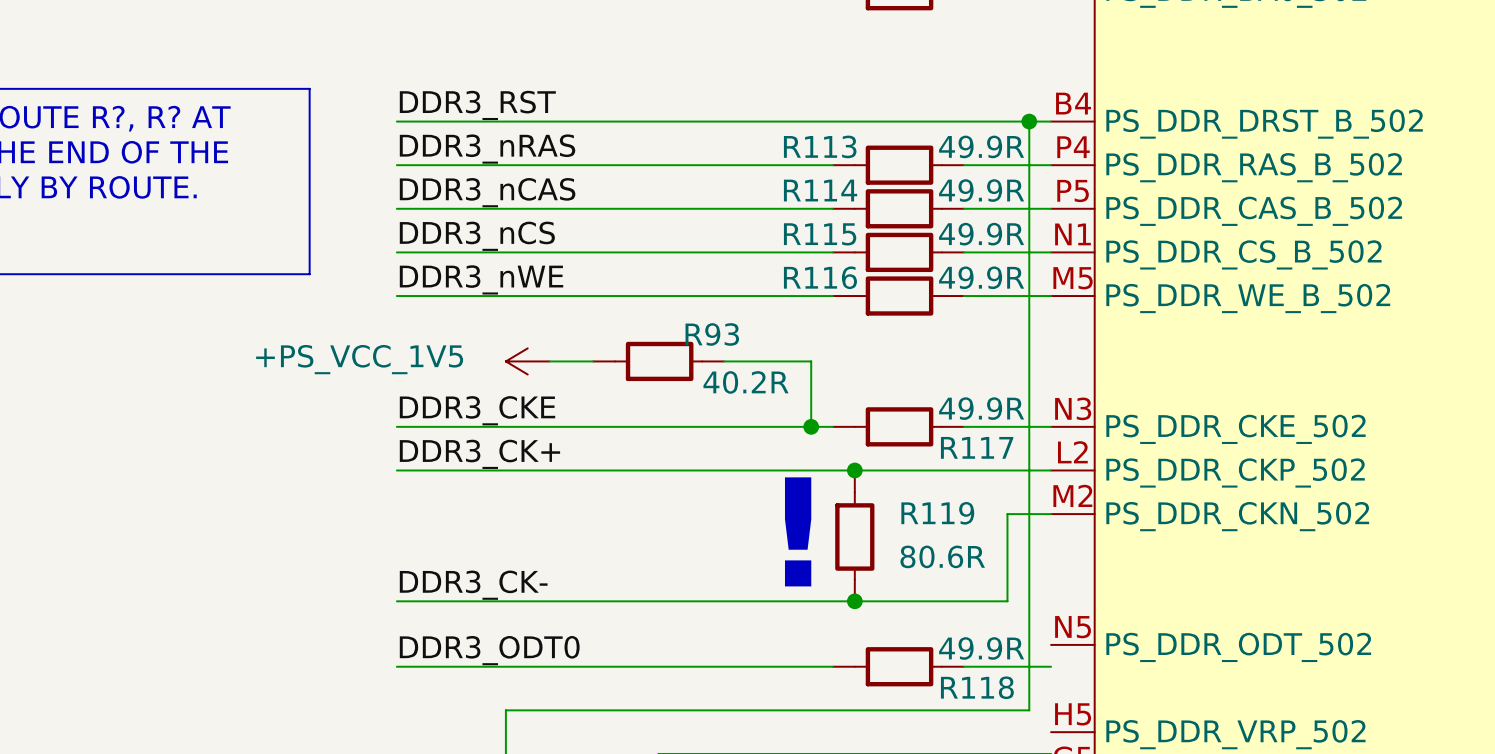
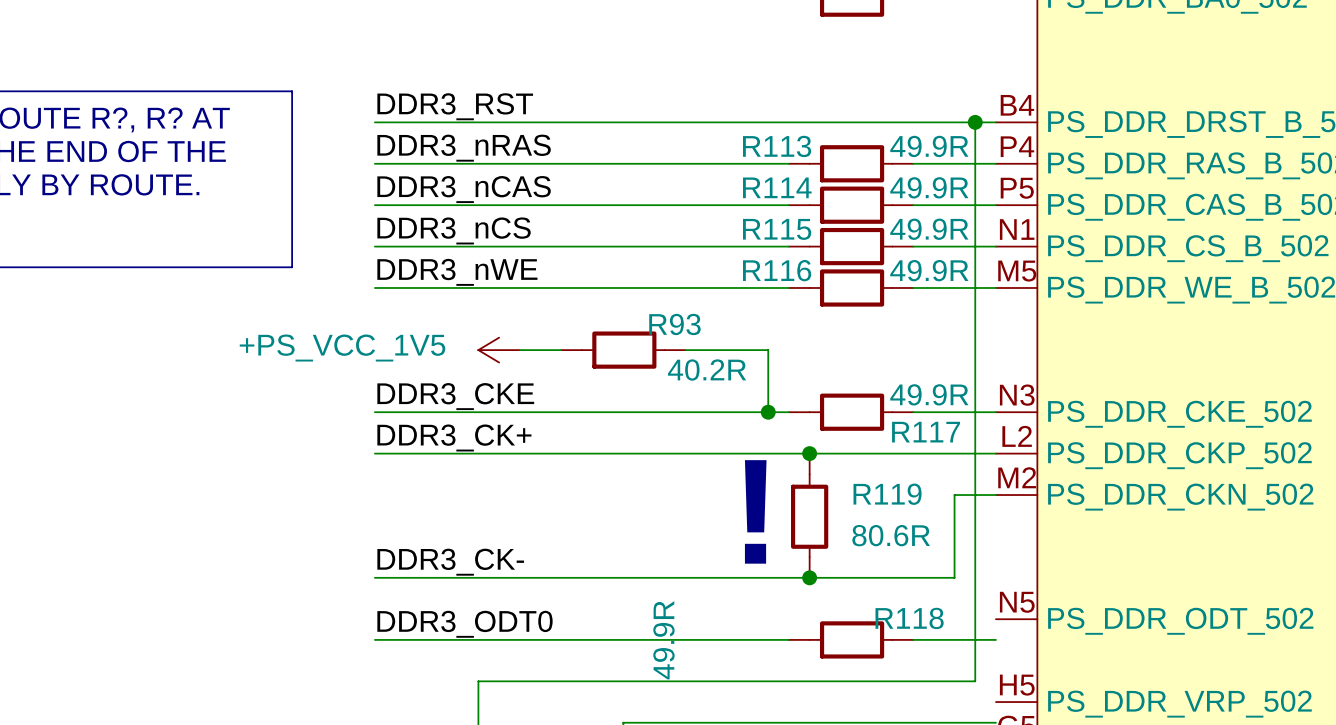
R118 text rotation: 0° (981, 648) -> 90° counterclockwise (663, 640)
R118 text position: 49.9R (981, 648) -> 49.9R (663, 640)
R118 name position: R118 (977, 687) -> R118 (909, 618)

